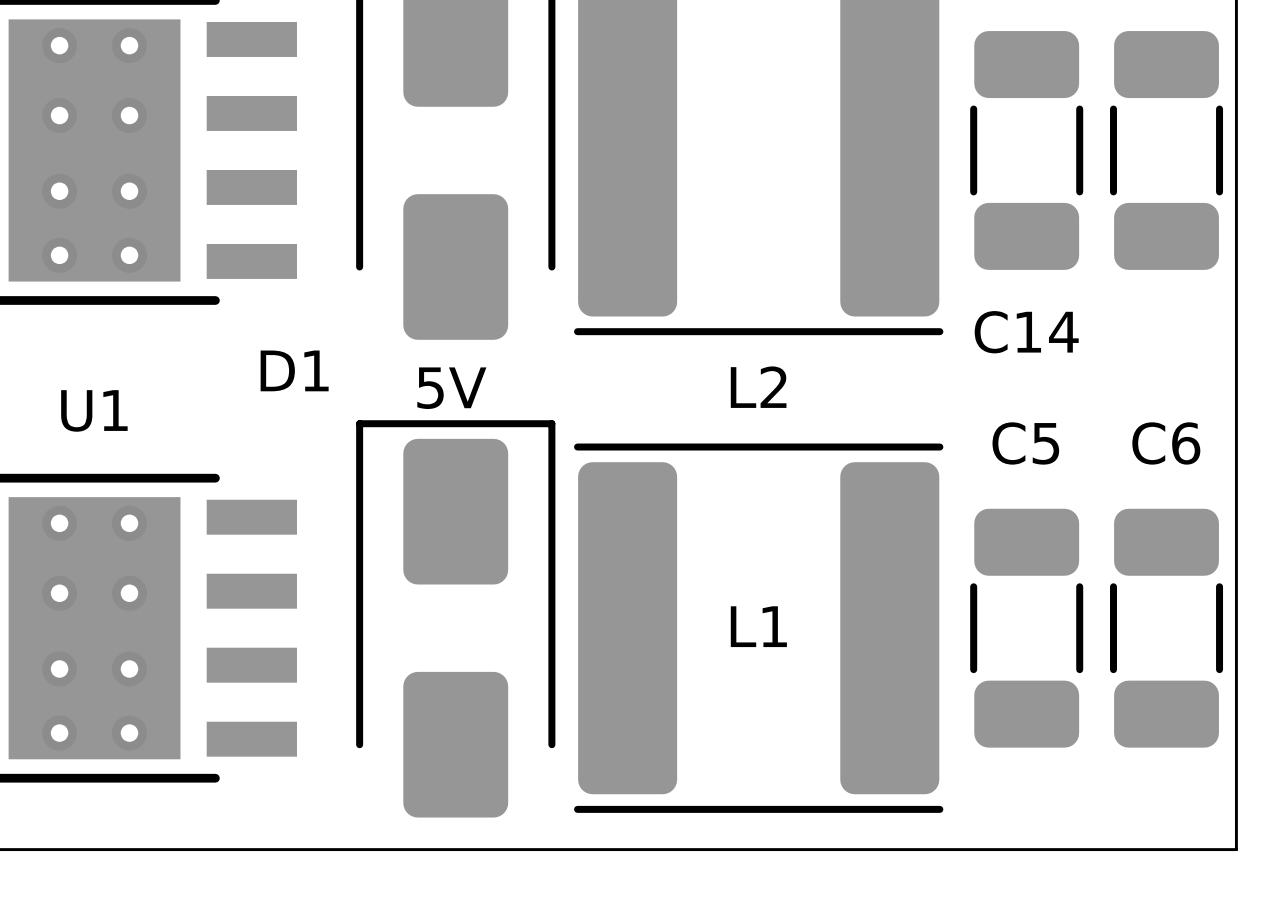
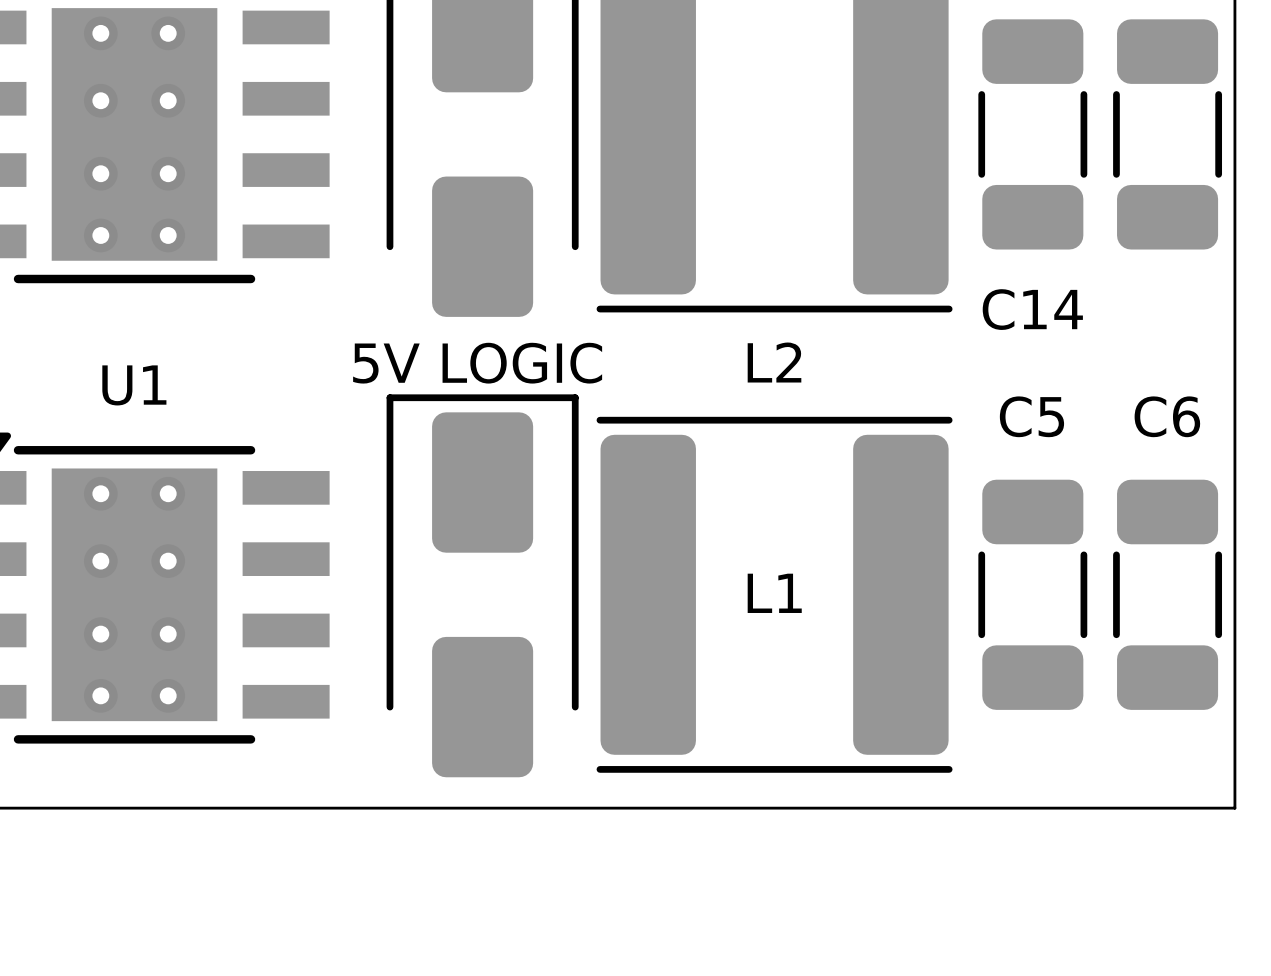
D1 name: D1 (294, 370) -> none
text: 5V (451, 388) -> 5V LOGIC (477, 363)

